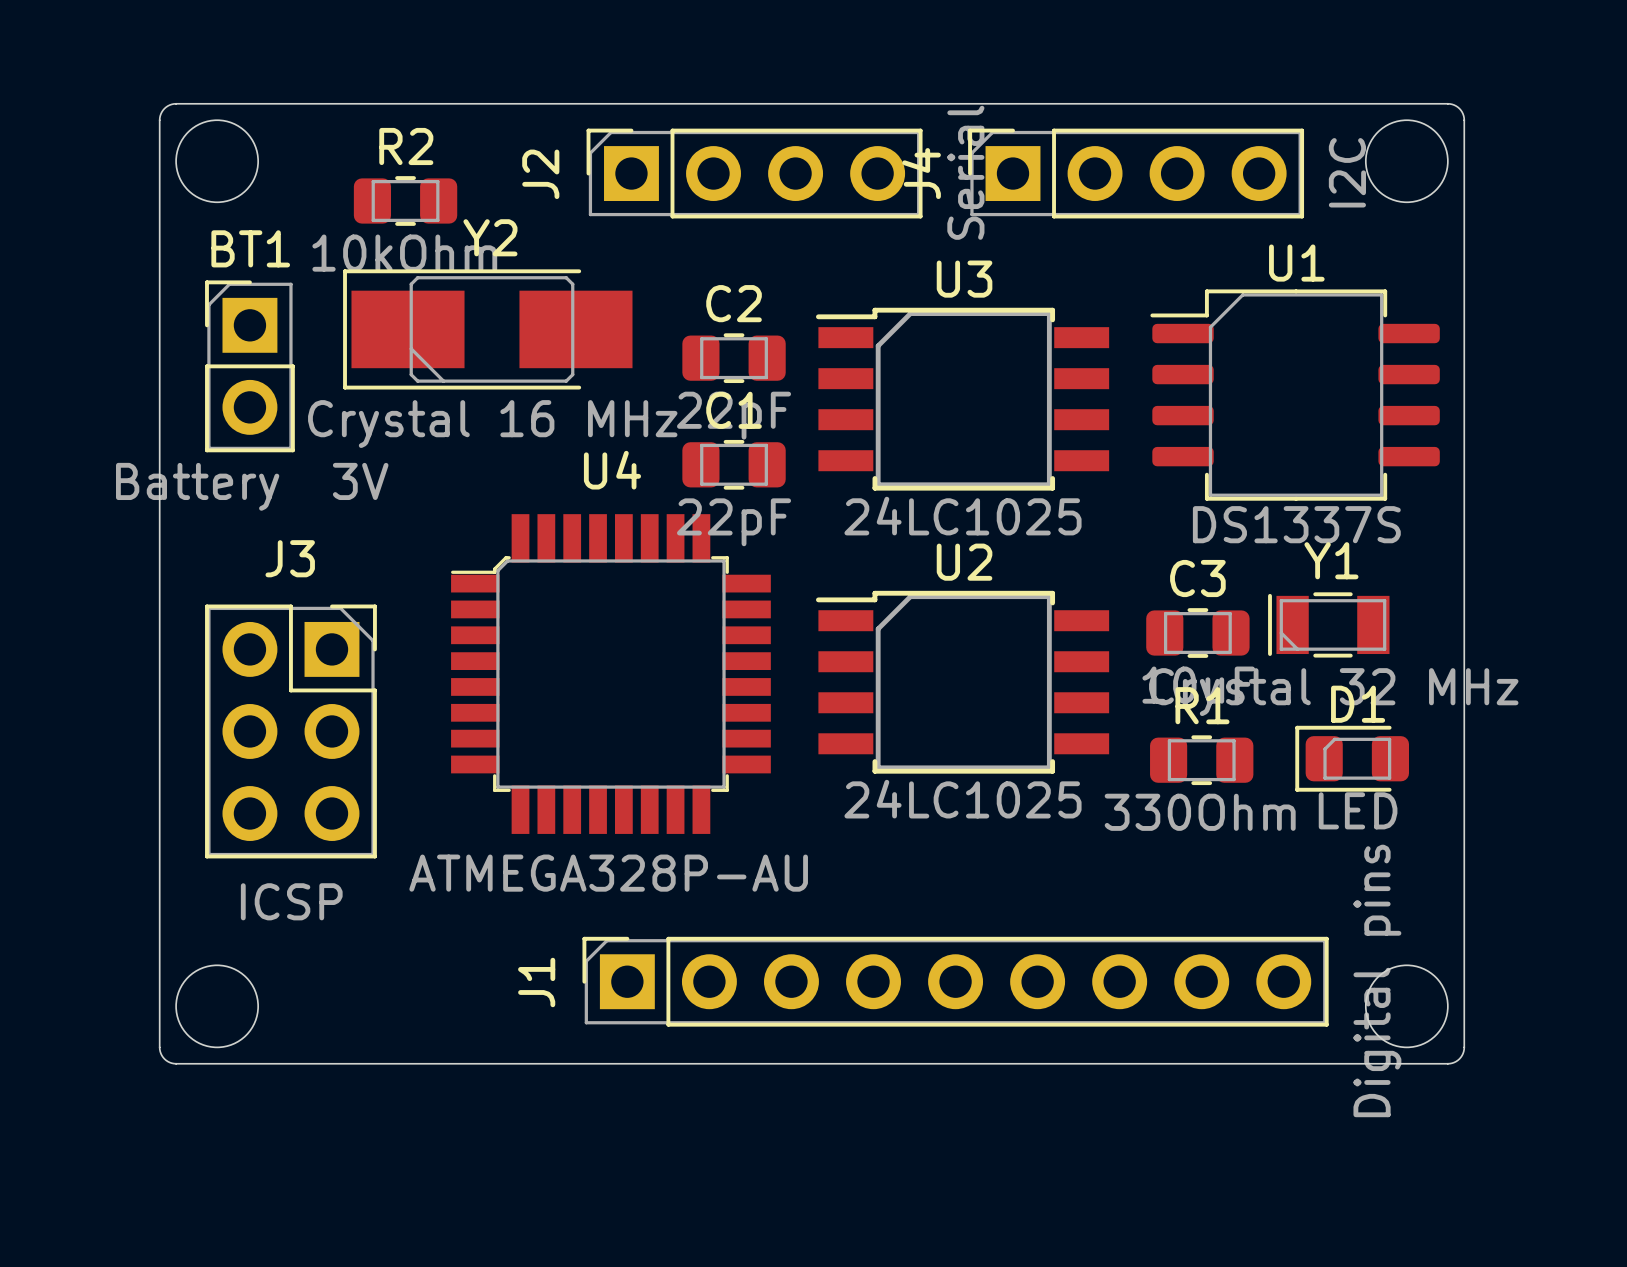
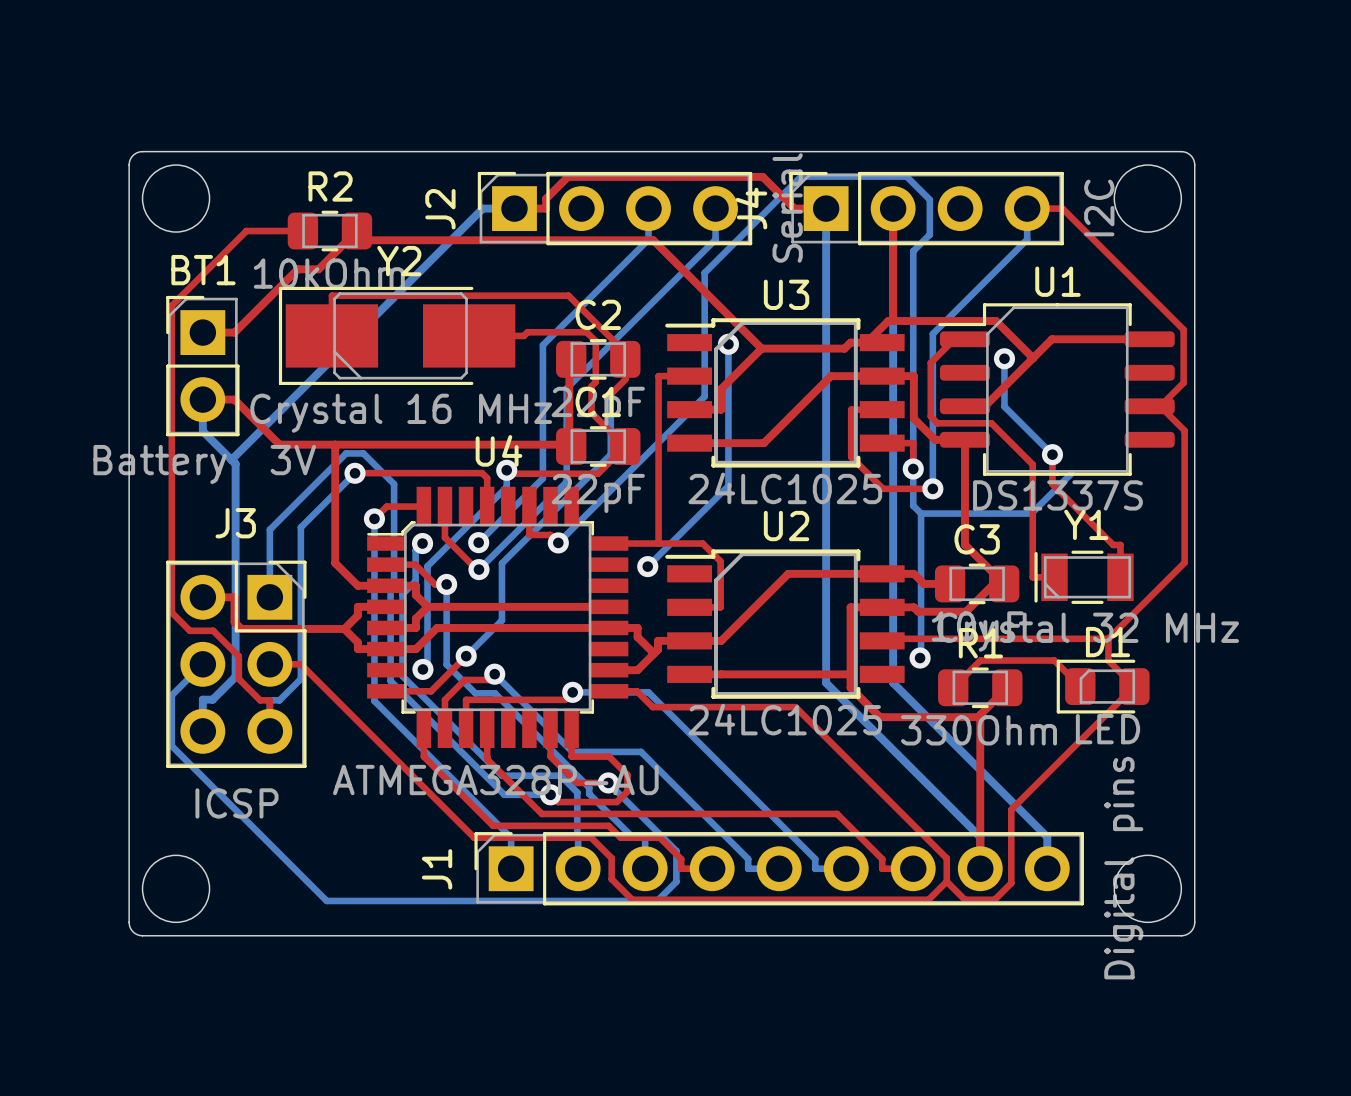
top track: none -> (514, 208) (546, 208) (546, 198) (567, 176) (762, 176) (794, 208) (826, 208)
bottom track: none -> (514, 208) (482, 208) (231, 459)
bottom track: none -> (648, 208) (648, 239) (542, 345) (542, 478) (478, 542)
bottom track: none -> (715, 208) (715, 239) (566, 388) (566, 481) (478, 569)
bottom track: none -> (826, 208) (826, 682) (980, 837) (980, 868)
top track: none -> (893, 208) (893, 321)
bottom track: none -> (893, 208) (893, 682) (1047, 837) (1047, 868)
top track: none -> (1027, 208) (1062, 208) (1183, 329) (1183, 382) (1160, 406)
bottom track: none -> (1027, 208) (1027, 239) (932, 333) (932, 488)
top track: none -> (302, 231) (246, 231) (171, 305) (171, 612) (189, 630) (213, 630) (238, 656) (238, 679) (260, 700) (269, 700) (269, 731)
top track: none -> (202, 332) (234, 332) (297, 269) (318, 269) (356, 231) (366, 240) (653, 240) (761, 348)
top track: none -> (331, 335) (331, 295) (568, 295) (625, 352) (625, 379) (610, 394)
top track: none -> (469, 335) (523, 335) (527, 332) (586, 332) (595, 341) (595, 382) (591, 386) (591, 412) (625, 446) (598, 473) (510, 473) (506, 470)
top track: none -> (964, 339) (954, 339) (930, 362) (930, 416) (937, 423) (991, 423) (1032, 464) (1032, 577) (1054, 577)
top track: none -> (1149, 339) (1051, 339) (984, 406) (964, 406)
top track: none -> (866, 342) (888, 321) (995, 321) (1033, 358)
top track: none -> (882, 342) (850, 342) (844, 348) (761, 348)
bottom track: none -> (728, 344) (728, 485) (647, 566)
via: none -> (728, 344)
top track: none -> (761, 348) (721, 388) (721, 409) (689, 409)
bottom track: none -> (1004, 358) (1004, 406) (1052, 454)
via: none -> (1004, 358)
top track: none -> (571, 359) (569, 361) (569, 444)
top track: none -> (689, 376) (658, 376) (658, 543)
bottom track: none -> (610, 394) (610, 454) (501, 563) (501, 620) (466, 656)
top track: none -> (202, 399) (234, 399) (279, 444) (569, 444)
bottom track: none -> (202, 399) (202, 431) (235, 464) (235, 676) (212, 699) (202, 699) (202, 731)
top track: none -> (1160, 406) (1184, 430) (1184, 562) (1108, 638)
top track: none -> (882, 409) (851, 409) (851, 456) (883, 488) (932, 488)
top track: none -> (689, 443) (763, 443) (830, 376) (913, 376) (913, 418) (935, 439) (964, 439) (964, 544) (1004, 583)
top track: none -> (882, 443) (913, 443) (913, 468)
top track: none -> (335, 444) (335, 563) (357, 585) (415, 585) (415, 595) (427, 606)
top track: none -> (1052, 454) (1052, 484) (1113, 544) (1120, 544) (1120, 577)
via: none -> (1052, 454)
via: none -> (913, 469)
bottom track: none -> (506, 470) (506, 487) (427, 566) (427, 664) (422, 669)
via: none -> (506, 470)
top track: none -> (355, 473) (482, 473) (487, 478) (487, 506)
bottom track: none -> (355, 473) (300, 527) (300, 679) (279, 700) (269, 700) (269, 731)
via: none -> (355, 473)
bottom track: none -> (1071, 473) (1031, 513) (921, 513)
via: none -> (932, 488)
top track: none -> (423, 506) (386, 506) (374, 518)
top track: none -> (444, 506) (444, 537) (478, 569)
top track: none -> (529, 506) (529, 534) (550, 534) (558, 542)
bottom track: none -> (921, 513) (913, 505) (913, 251) (929, 234) (929, 199) (906, 176) (801, 176) (704, 272) (704, 396) (558, 542)
bottom track: none -> (921, 513) (920, 658)
bottom track: none -> (374, 518) (374, 701) (511, 837) (511, 868)
via: none -> (374, 518)
via: none -> (478, 542)
via: none -> (558, 542)
bottom track: none -> (422, 543) (415, 550) (415, 581) (402, 594) (402, 676) (502, 775) (560, 775) (577, 792) (578, 868)
via: none -> (422, 543)
top track: none -> (608, 543) (702, 543) (720, 561) (720, 607) (689, 607)
top track: none -> (386, 564) (415, 564) (435, 584) (446, 584)
via: none -> (647, 566)
via: none -> (478, 569)
top track: none -> (999, 578) (966, 611) (918, 611) (913, 607) (850, 607) (850, 687) (879, 717) (980, 717)
bottom track: none -> (446, 584) (446, 664) (475, 693) (494, 693) (589, 787) (589, 793) (633, 837) (645, 837) (645, 868)
via: none -> (446, 584)
top track: none -> (950, 583) (923, 583) (913, 573) (788, 573) (721, 640) (657, 640) (657, 649) (637, 670) (608, 670)
top track: none -> (202, 597) (234, 597) (234, 622) (241, 628) (344, 628)
bottom track: none -> (269, 597) (269, 529) (346, 453) (363, 453) (394, 484) (394, 579) (390, 583) (390, 680) (504, 794) (550, 794)
top track: none -> (386, 606) (357, 606) (357, 615) (344, 628)
top track: none -> (427, 606) (608, 606)
top track: none -> (427, 606) (415, 618) (415, 627) (386, 627)
top track: none -> (344, 628) (357, 642) (357, 649) (415, 649) (437, 627) (637, 627) (637, 637) (654, 653)
top track: none -> (1108, 638) (884, 638) (882, 640)
top track: none -> (1108, 638) (1108, 660) (1134, 686) (1011, 809) (1011, 883) (994, 899) (964, 899) (946, 881)
top track: none -> (466, 656) (431, 691) (386, 691)
via: none -> (466, 656)
via: none -> (920, 658)
bottom track: none -> (202, 664) (171, 695) (171, 746) (326, 900) (657, 900) (676, 881) (676, 850) (608, 782)
top track: none -> (269, 664) (300, 664) (474, 837) (591, 837) (611, 858) (611, 879) (632, 899) (928, 899) (946, 881)
via: none -> (422, 669)
top track: none -> (494, 674) (488, 679) (464, 679) (444, 699) (444, 728)
bottom track: none -> (494, 674) (572, 751) (641, 751) (748, 859) (748, 868) (779, 868)
via: none -> (494, 674)
top track: none -> (689, 674) (850, 674)
top track: none -> (1080, 686) (1054, 660) (980, 660) (953, 687)
top track: none -> (1007, 687) (980, 714) (980, 868)
top track: none -> (608, 691) (636, 691) (652, 707) (795, 707) (946, 858) (946, 881)
top track: none -> (572, 692) (565, 699) (466, 699) (466, 728)
bottom track: none -> (572, 692) (648, 692) (815, 859) (815, 868) (846, 868)
via: none -> (572, 692)
top track: none -> (423, 728) (423, 756) (493, 825) (608, 825) (620, 837) (659, 837) (681, 859) (681, 868) (712, 868)
top track: none -> (487, 728) (487, 759) (541, 813) (837, 813) (882, 859) (882, 868) (913, 868)
top track: none -> (550, 728) (550, 756) (576, 782) (608, 782)
top track: none -> (571, 728) (571, 756) (609, 756) (627, 775) (627, 791) (616, 802) (557, 802) (550, 794)
via: none -> (608, 782)
via: none -> (550, 794)

